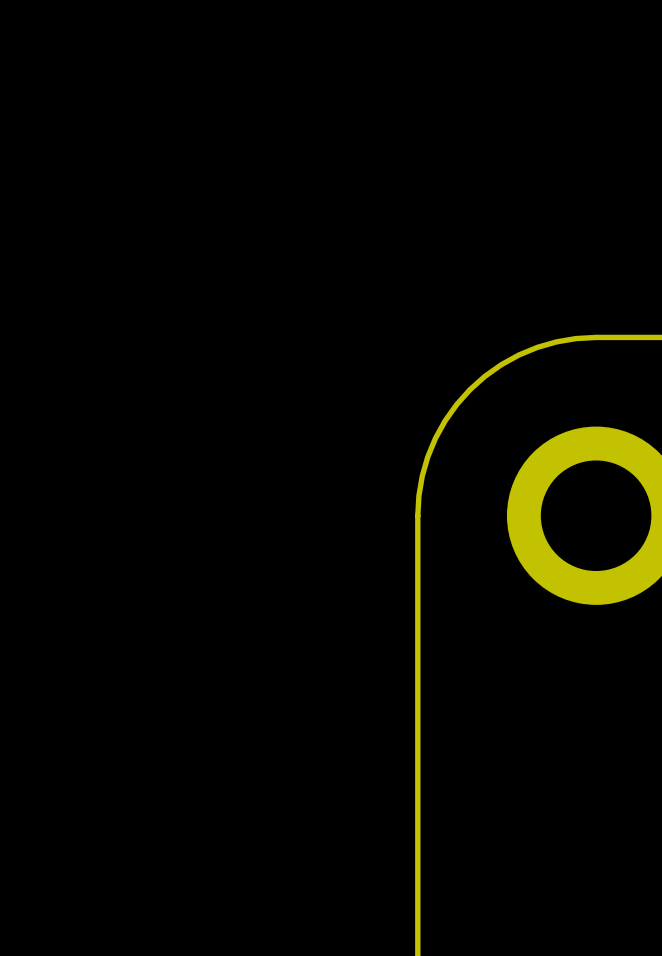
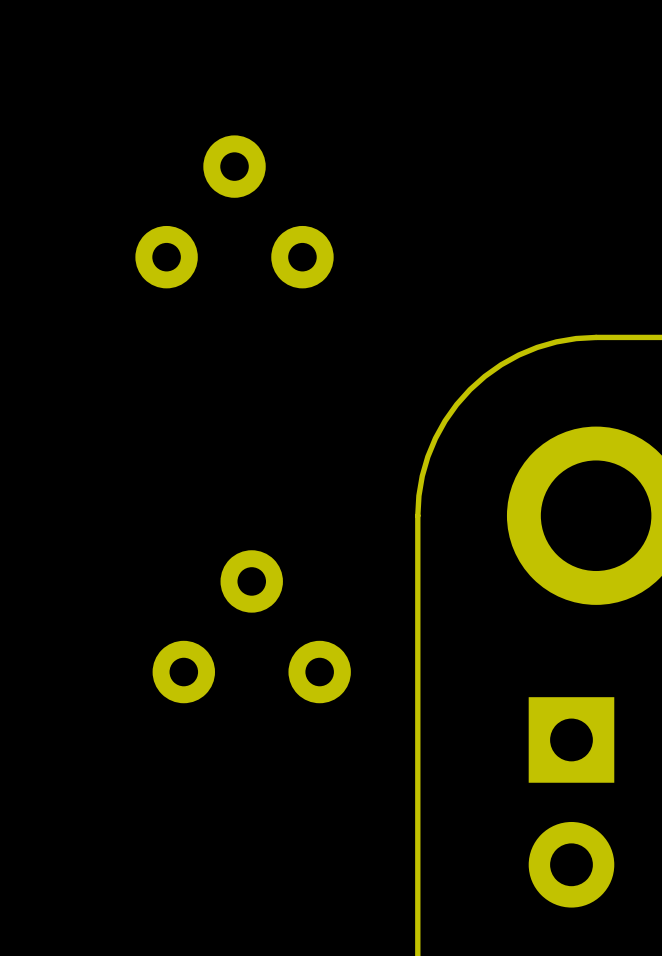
part: none -> (234, 211)
part: none -> (251, 626)
part: none -> (571, 802)

